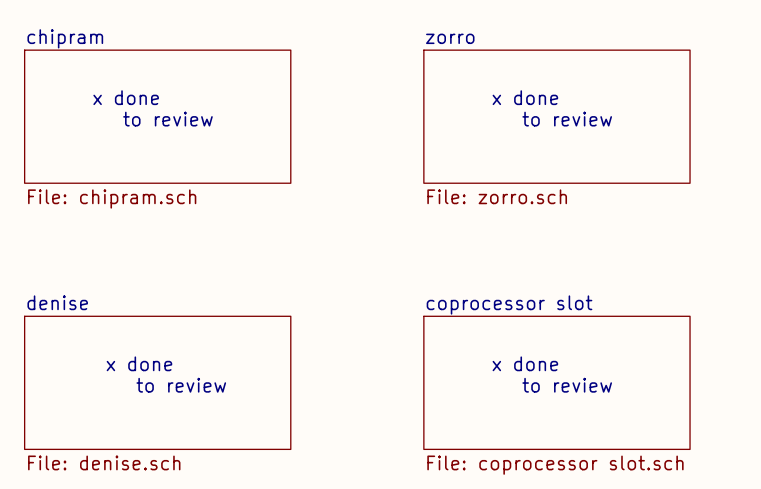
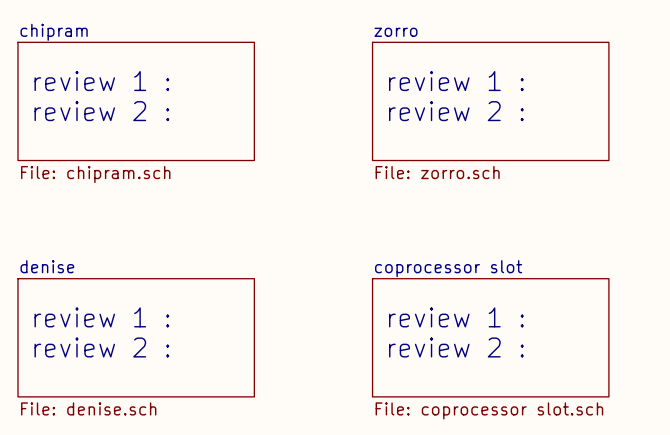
text: none -> review 1 : (101, 81)
text: none -> review 1 : (456, 81)
text: x done (126, 97) -> none
text: x done (525, 97) -> none
text: to review (167, 119) -> none
text: to review (567, 119) -> none
text: none -> review 2 : (101, 111)
text: none -> review 2 : (456, 111)
text: none -> review 1 : (101, 317)
text: none -> review 1 : (456, 317)
text: x done (139, 363) -> none
text: x done (525, 363) -> none
text: to review (181, 385) -> none
text: to review (567, 385) -> none
text: none -> review 2 : (101, 347)
text: none -> review 2 : (456, 347)

